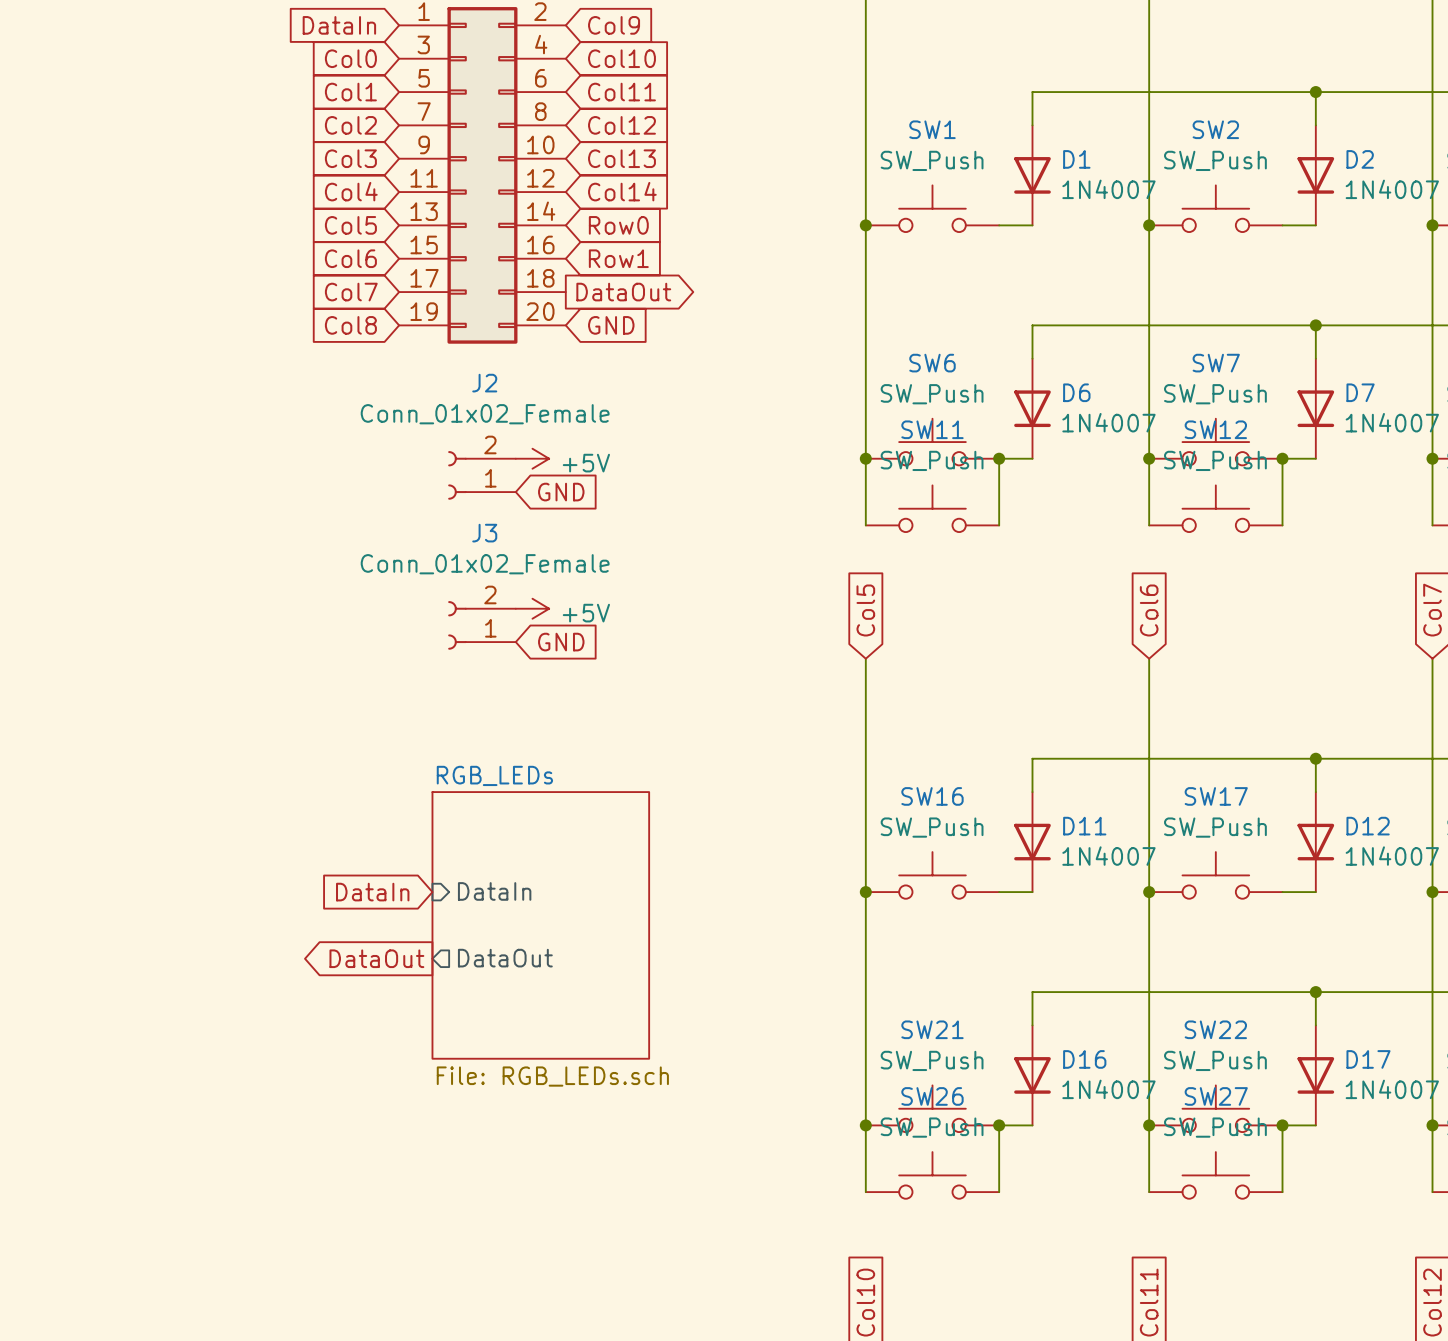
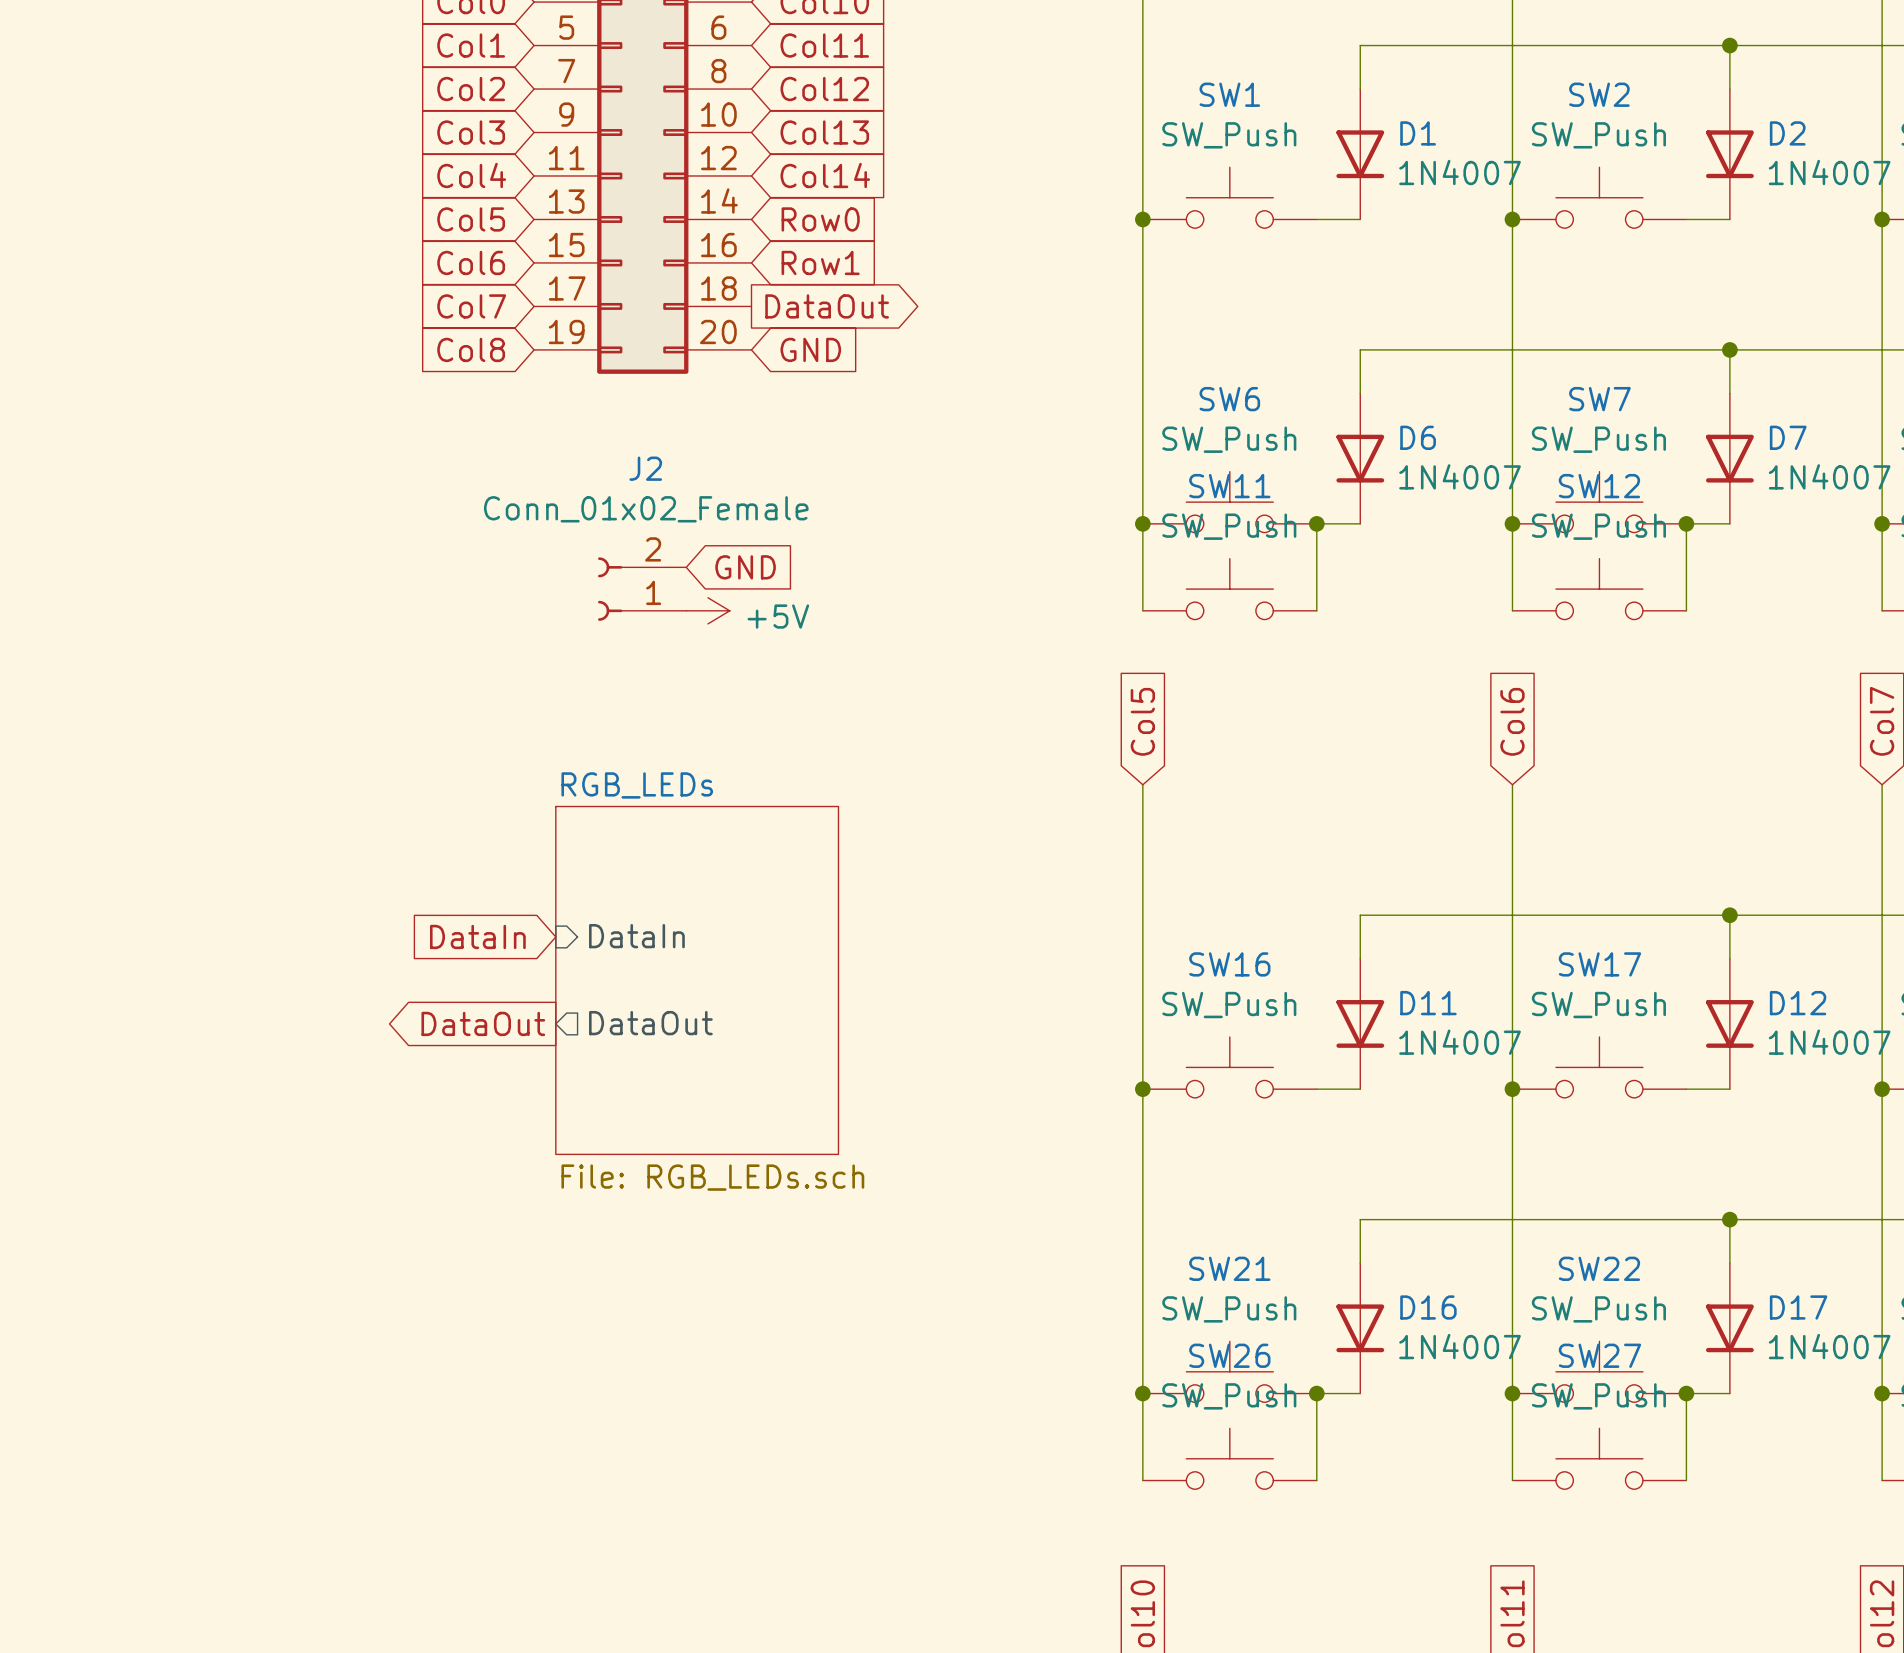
power symbol: +5V (532, 458) -> none
J2 position: (481, 475) -> (642, 589)
power symbol: none -> +5V (708, 610)
power symbol: +5V (532, 608) -> none
J3: Conn_01x02_Female (481, 625) -> none
global label: GND (561, 642) -> none
sheet pin position: DataIn (494, 891) -> DataIn (636, 936)
global label position: DataIn (372, 892) -> DataIn (477, 936)
sheet RGB_LEDs position: (540, 925) -> (697, 980)
global label position: DataOut (376, 958) -> DataOut (483, 1023)
sheet pin position: DataOut (505, 958) -> DataOut (650, 1023)

